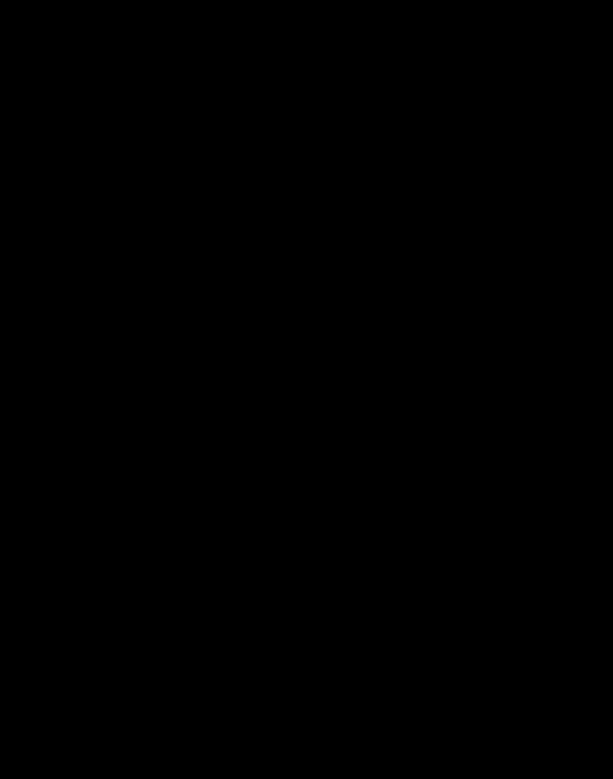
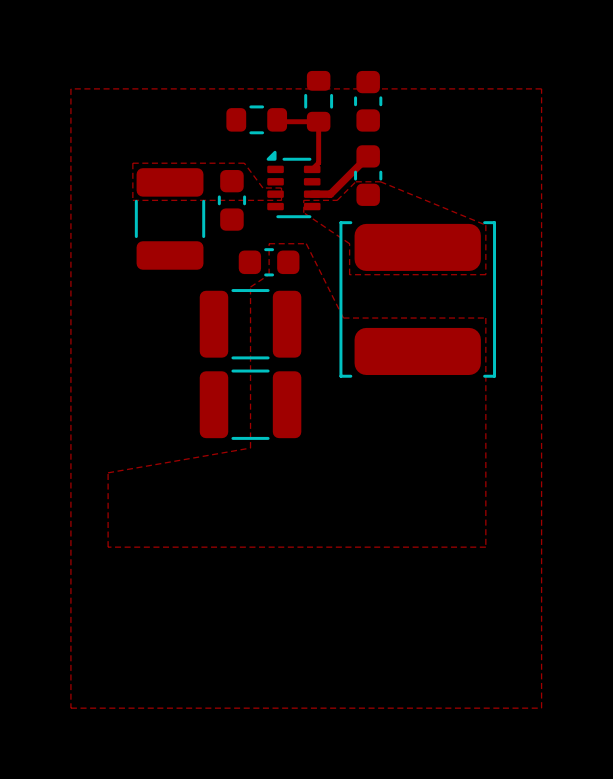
zone outline: none -> (70, 88) (70, 708) (541, 708) (541, 88) (70, 88)
part: none -> (318, 101)
part: none -> (368, 101)
part: none -> (256, 119)
track: none -> (277, 119) (279, 121) (318, 121) (318, 162) (312, 169)
track: none -> (368, 156) (330, 194) (312, 194)
zone outline: none -> (132, 163) (244, 163) (262, 187) (281, 187) (281, 200) (132, 200) (132, 163)
part: none -> (368, 175)
zone outline: none -> (355, 181) (337, 200) (303, 200) (303, 212) (349, 243) (349, 274) (485, 274) (485, 225) (380, 181) (355, 181)
part: none -> (293, 184)
part: none -> (231, 200)
part: none -> (170, 218)
zone outline: none -> (269, 243) (306, 243) (343, 318) (485, 318) (485, 547) (108, 547) (108, 472) (250, 448) (250, 287) (269, 274) (269, 243)
part: none -> (269, 262)
part: none -> (417, 299)
part: none -> (250, 324)
part: none -> (250, 404)

